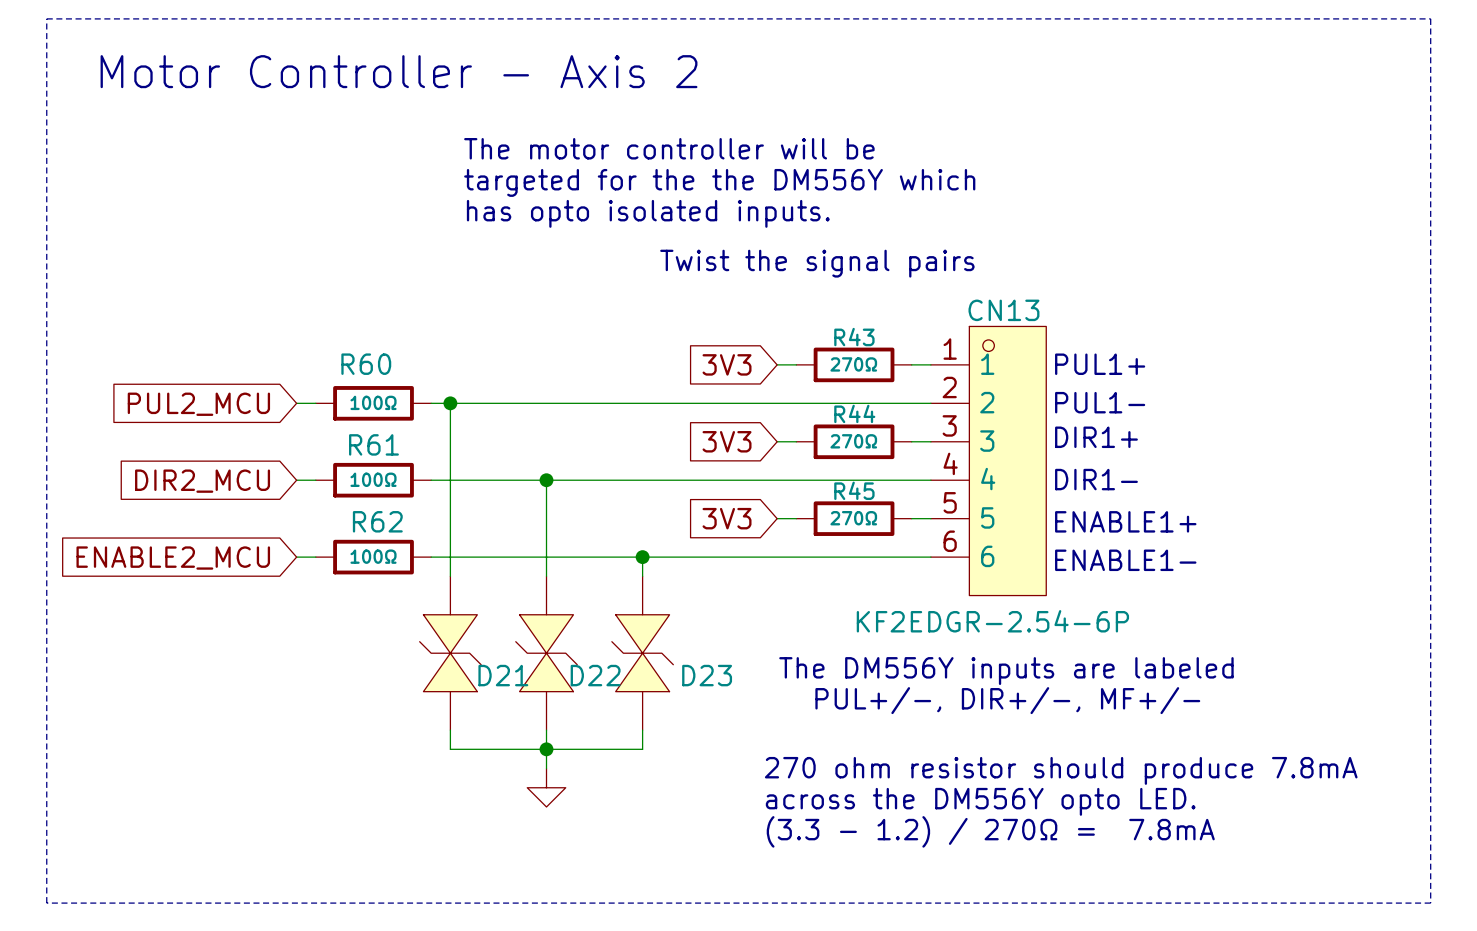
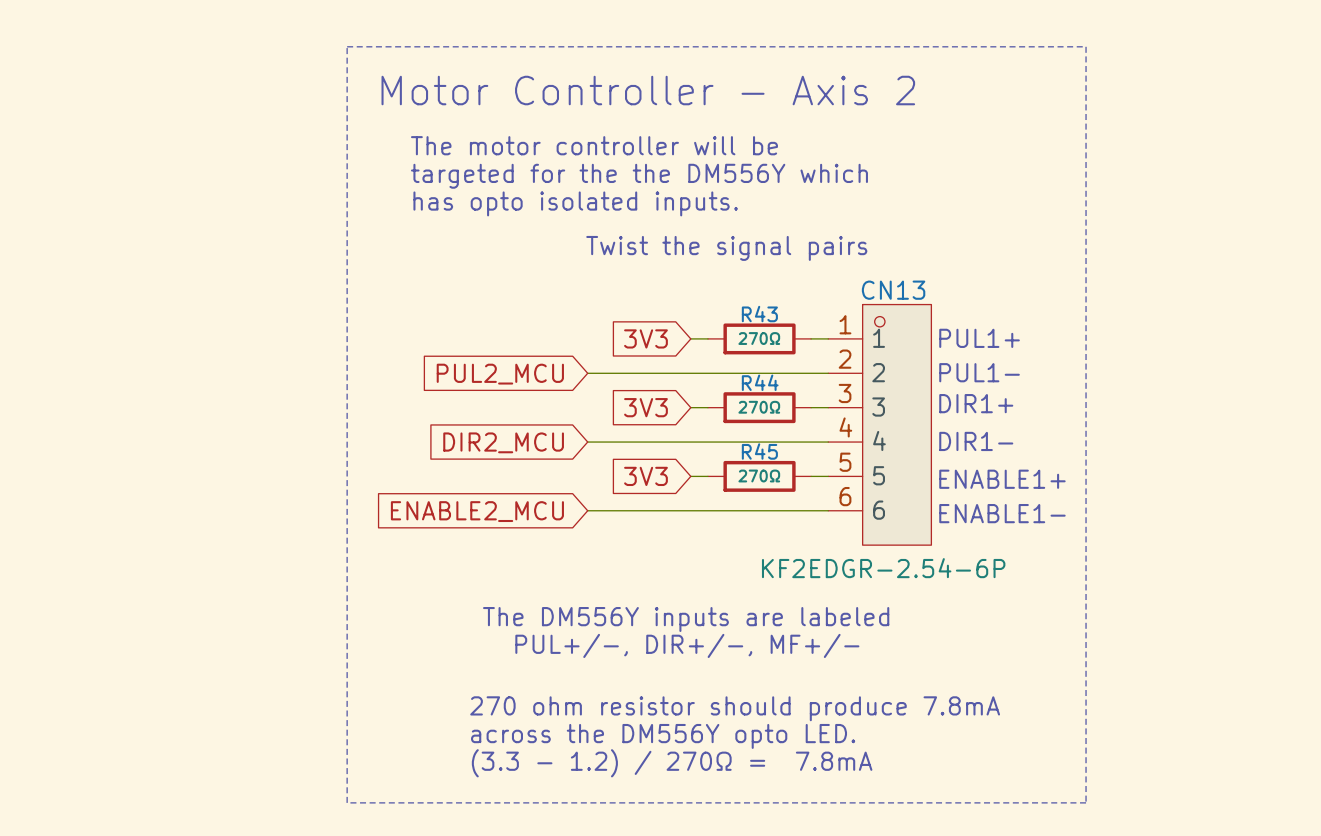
line: (46, 18) (1430, 18) (1430, 903) (46, 903) (46, 18) -> (347, 46) (347, 802) (1086, 802) (1086, 46) (347, 46)
text position: Motor Controller - Axis 2 (399, 71) -> Motor Controller - Axis 2 (648, 90)
wire: (296, 403) (315, 403) -> none
R60: 100Ω (373, 403) -> none
wire: (431, 403) (661, 403) -> none
wire: (450, 403) (450, 576) -> none
junction: (450, 403) -> none
global label position: PUL2_MCU (198, 404) -> PUL2_MCU (500, 374)
wire: (296, 480) (315, 480) -> none
R61: 100Ω (373, 480) -> none
wire: (431, 480) (661, 480) -> none
wire: (546, 480) (546, 576) -> none
junction: (546, 480) -> none
global label position: DIR2_MCU (202, 481) -> DIR2_MCU (503, 442)
wire: (296, 557) (315, 557) -> none
R62: 100Ω (373, 557) -> none
wire: (431, 557) (661, 557) -> none
wire: (642, 557) (642, 576) -> none
junction: (642, 557) -> none
global label position: ENABLE2_MCU (173, 558) -> ENABLE2_MCU (477, 511)
D21: (450, 653) -> none
D22: (546, 653) -> none
D23: (642, 653) -> none
text position: The DM556Y inputs are labeled (1006, 671) -> The DM556Y inputs are labeled (686, 619)
text position: PUL+/-, DIR+/-, MF+/- (1007, 700) -> PUL+/-, DIR+/-, MF+/- (687, 645)
wire: (450, 730) (450, 749) (642, 749) (642, 730) -> none
wire: (546, 730) (546, 768) -> none
junction: (546, 749) -> none
text position: 270 ohm resistor should produce 7.8mA (1061, 770) -> 270 ohm resistor should produce 7.8mA (735, 708)
power symbol: (546, 787) -> none
text position: across the DM556Y opto LED. (980, 801) -> across the DM556Y opto LED. (663, 736)
text position: (3.3 - 1.2) / 270Ω = 7.8mA (990, 831) -> (3.3 - 1.2) / 270Ω = 7.8mA (672, 763)

